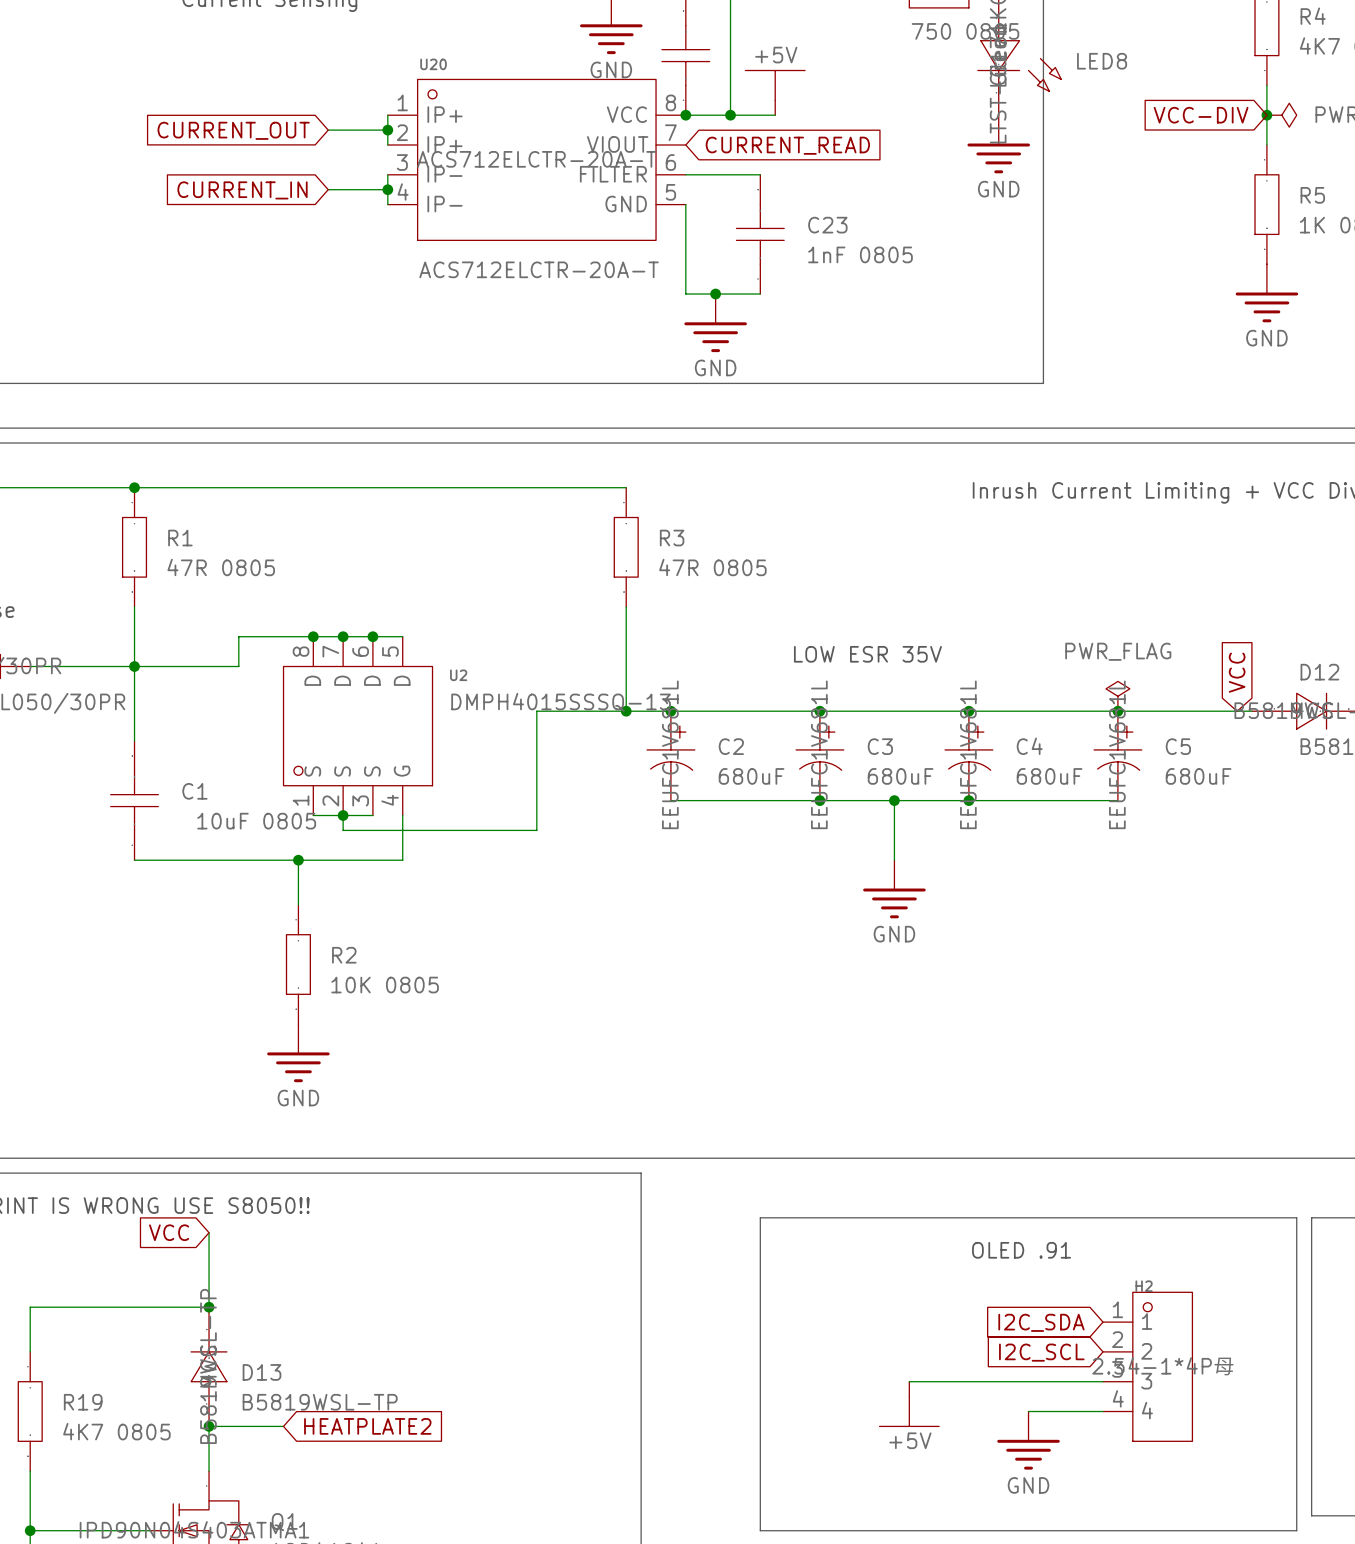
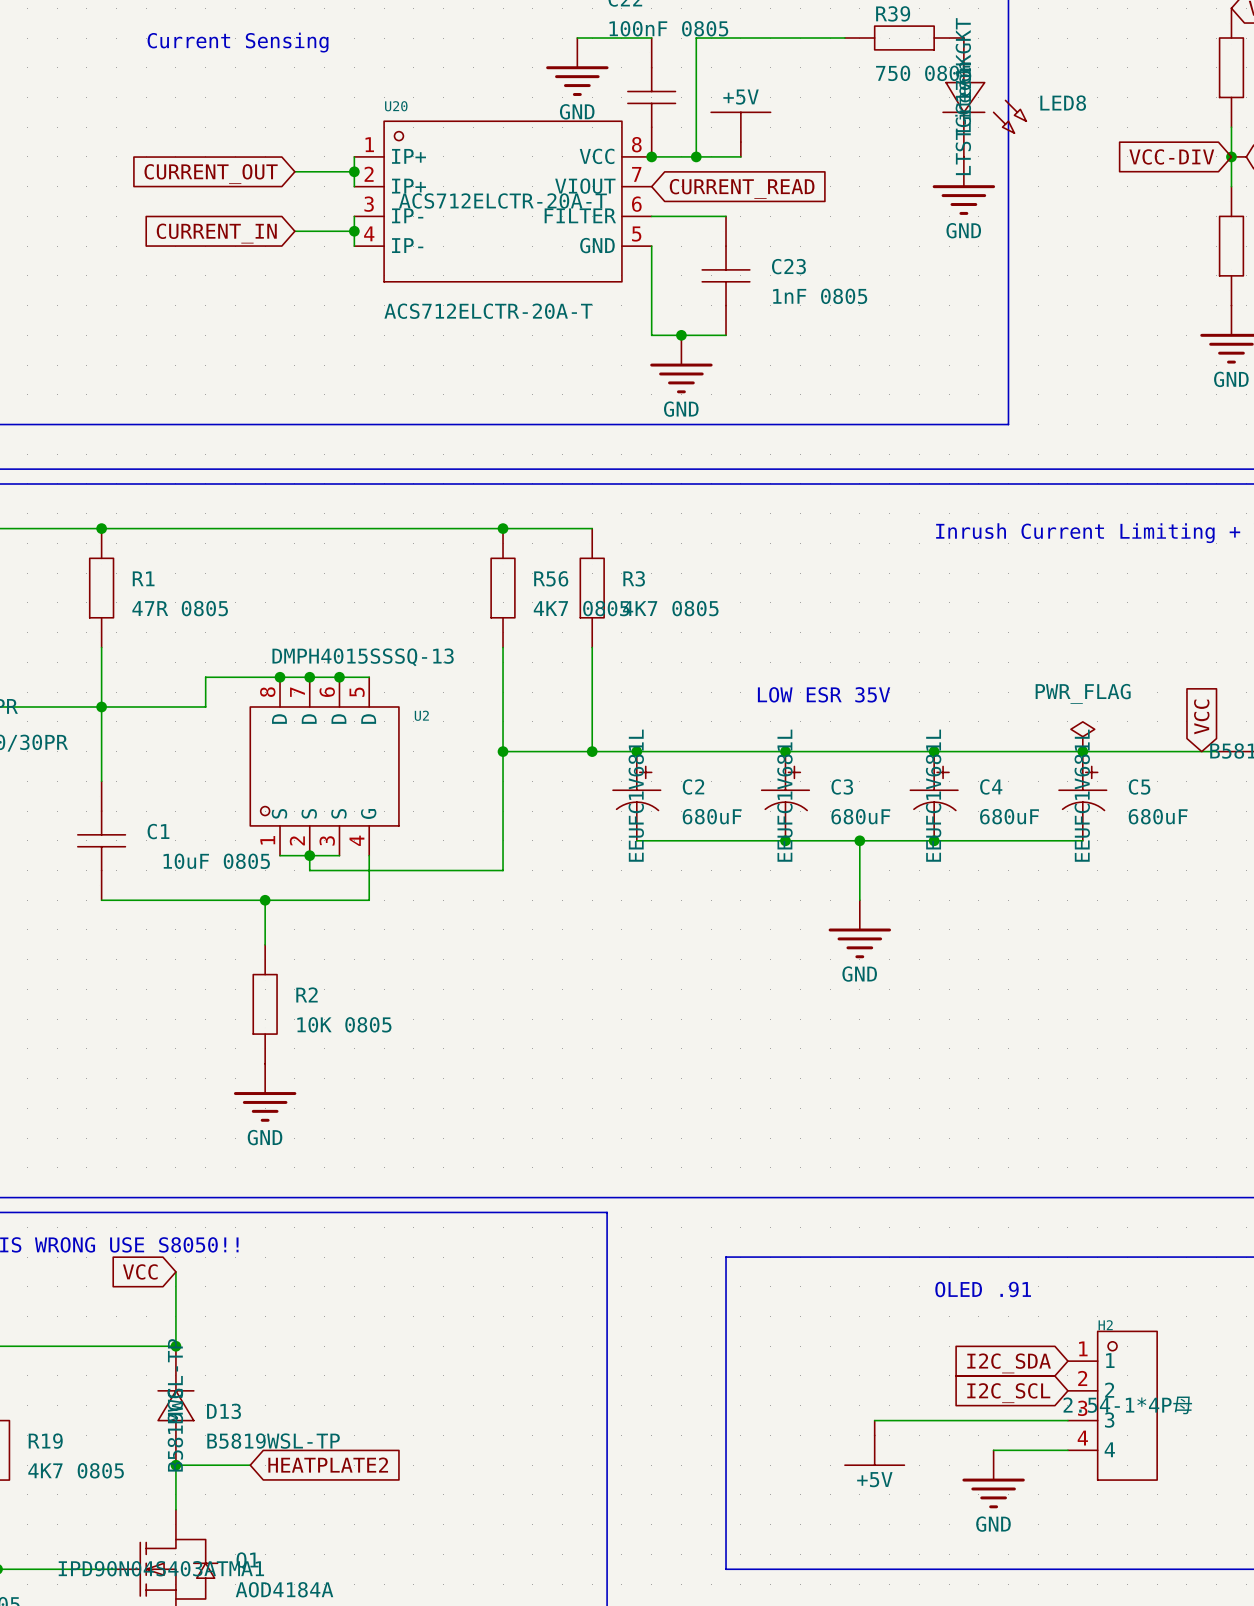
junction: none -> (503, 528)
R56: none -> 4K7 0805 (503, 588)
R3 value: 47R 0805 (712, 567) -> 4K7 0805 (670, 608)
wire: none -> (503, 647) (503, 751)
U2 value position: DMPH4015SSSQ-13 (561, 702) -> DMPH4015SSSQ-13 (363, 657)
junction: none -> (503, 751)

